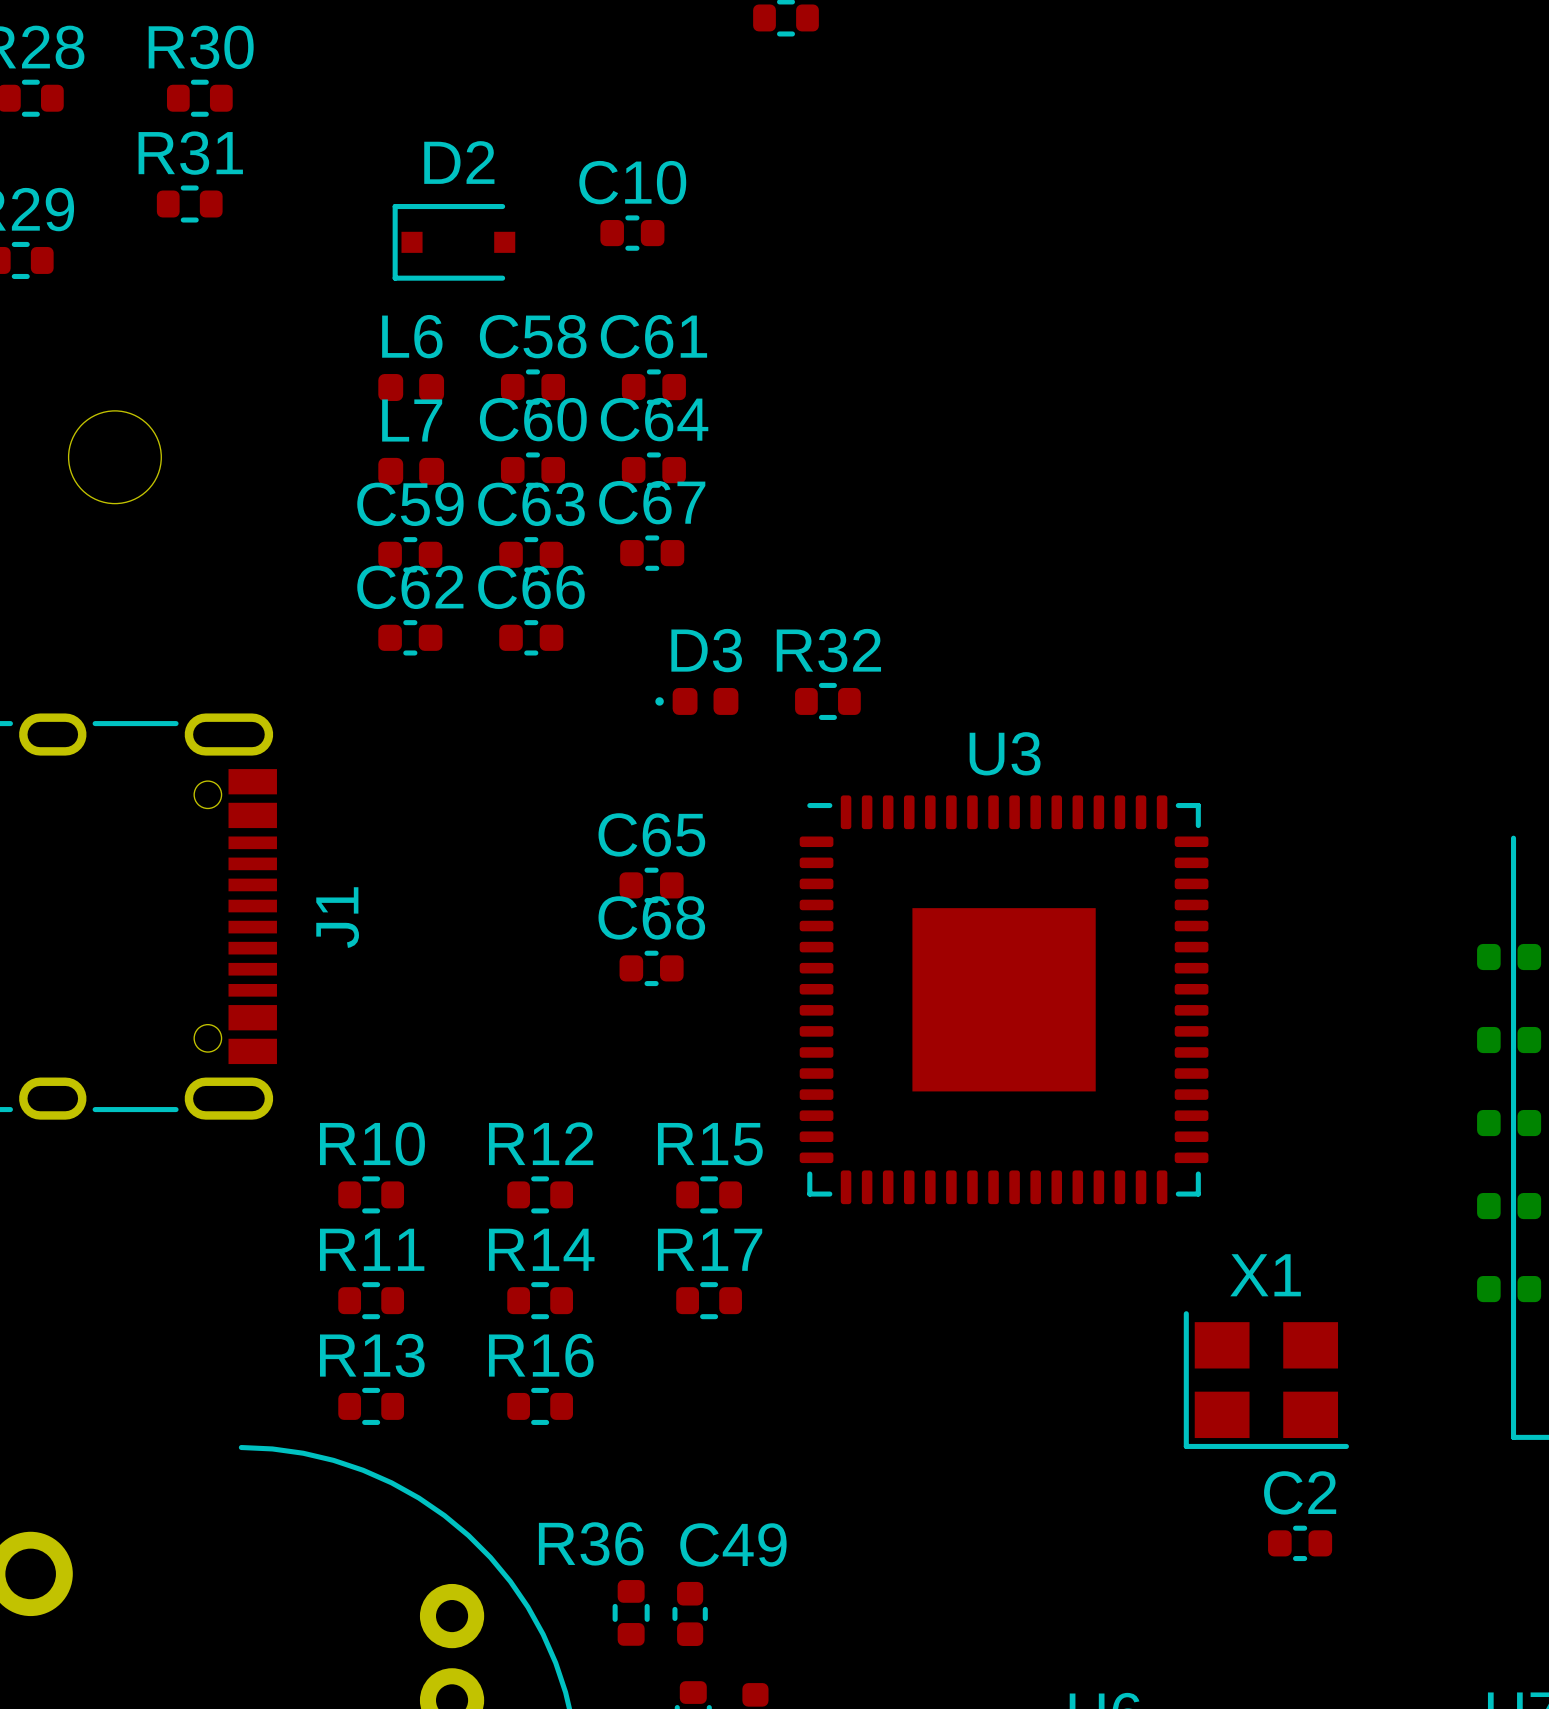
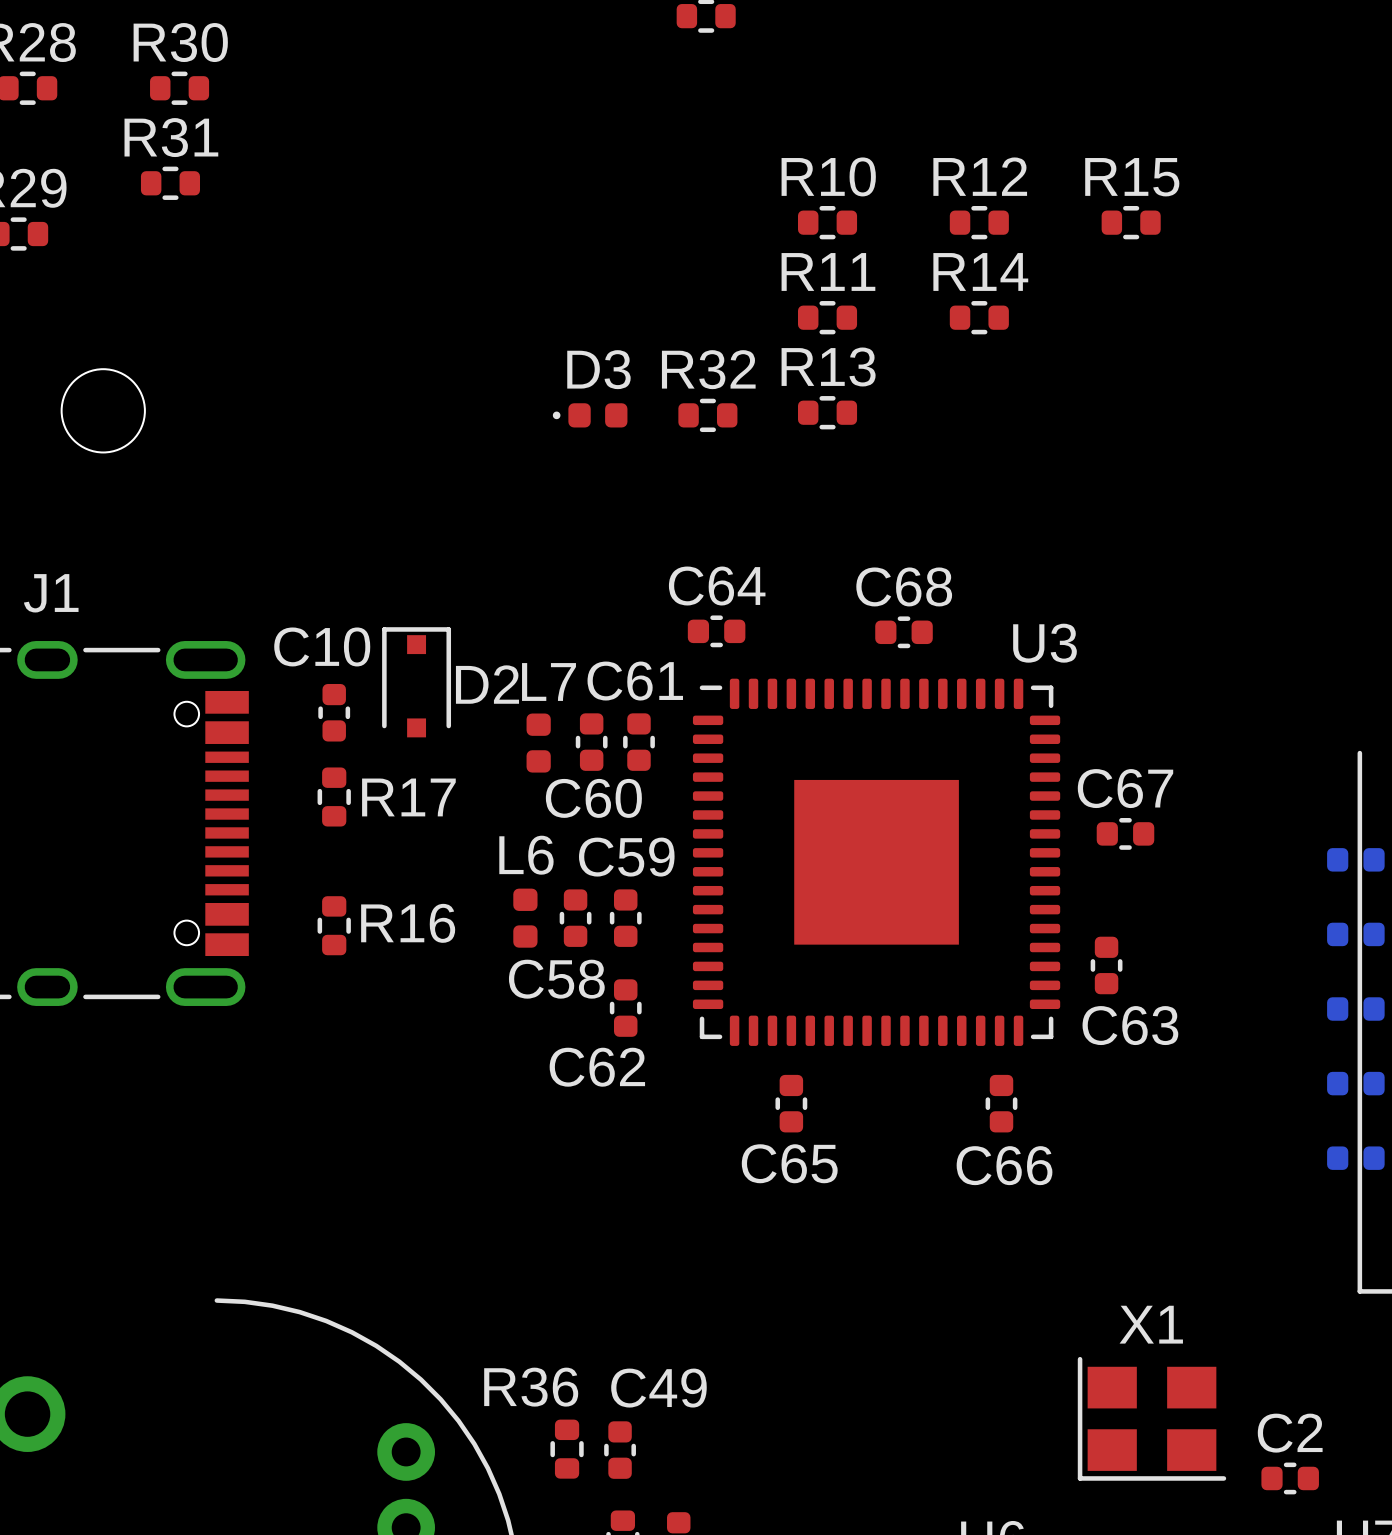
C10 rotation: 0° (632, 233) -> 90° clockwise (334, 712)
C10 position: (632, 233) -> (334, 712)
D2 rotation: 0° (453, 242) -> 90° clockwise (416, 682)
D2 position: (453, 242) -> (416, 682)
C58 name position: C58 (533, 336) -> C58 (556, 979)
L6 rotation: 0° (411, 387) -> 90° clockwise (525, 918)
L6 position: (411, 387) -> (525, 918)
C58 rotation: 0° (532, 387) -> 90° clockwise (575, 918)
C58 position: (532, 387) -> (575, 918)
C61 rotation: 0° (653, 387) -> 90° clockwise (638, 742)
C61 position: (653, 387) -> (638, 742)
C60 rotation: 0° (532, 470) -> 90° clockwise (591, 742)
C60 position: (532, 470) -> (591, 742)
C64 position: (653, 470) -> (716, 631)
L7 rotation: 0° (411, 471) -> 90° clockwise (538, 743)
L7 position: (411, 471) -> (538, 743)
C67 position: (652, 553) -> (1125, 833)
C59 rotation: 0° (410, 554) -> 90° clockwise (625, 918)
C59 position: (410, 554) -> (625, 918)
C63 rotation: 0° (531, 554) -> 90° clockwise (1106, 965)
C63 position: (531, 554) -> (1106, 965)
C62 name position: C62 (410, 587) -> C62 (597, 1067)
C66 name position: C66 (531, 587) -> C66 (1004, 1165)
C62 rotation: 0° (410, 637) -> 90° clockwise (625, 1008)
C62 position: (410, 637) -> (625, 1008)
C66 rotation: 0° (531, 637) -> 90° clockwise (1001, 1103)
C66 position: (531, 637) -> (1001, 1103)
D3 position: (696, 701) -> (590, 415)
R32 position: (827, 701) -> (707, 415)
U3 name position: U3 (1005, 753) -> U3 (1045, 643)
C65 name position: C65 (651, 834) -> C65 (789, 1163)
C65 rotation: 0° (651, 885) -> 90° clockwise (791, 1103)
C65 position: (651, 885) -> (791, 1103)
J1 name rotation: 0° (337, 917) -> 90° clockwise (51, 593)
J1 name position: J1 (337, 917) -> J1 (51, 593)
C68 position: (651, 968) -> (904, 632)
U3 position: (1004, 999) -> (876, 862)
R10 position: (371, 1194) -> (827, 222)
R12 position: (540, 1194) -> (979, 222)
R15 position: (709, 1194) -> (1131, 222)
R11 position: (371, 1300) -> (827, 317)
R14 position: (540, 1300) -> (979, 317)
R17 rotation: 0° (709, 1300) -> 90° clockwise (334, 796)
R17 position: (709, 1300) -> (334, 796)
X1 position: (1266, 1380) -> (1151, 1418)
R13 position: (371, 1406) -> (827, 412)
R16 rotation: 0° (540, 1406) -> 90° clockwise (334, 925)
R16 position: (540, 1406) -> (334, 925)
C2 position: (1300, 1543) -> (1290, 1478)

